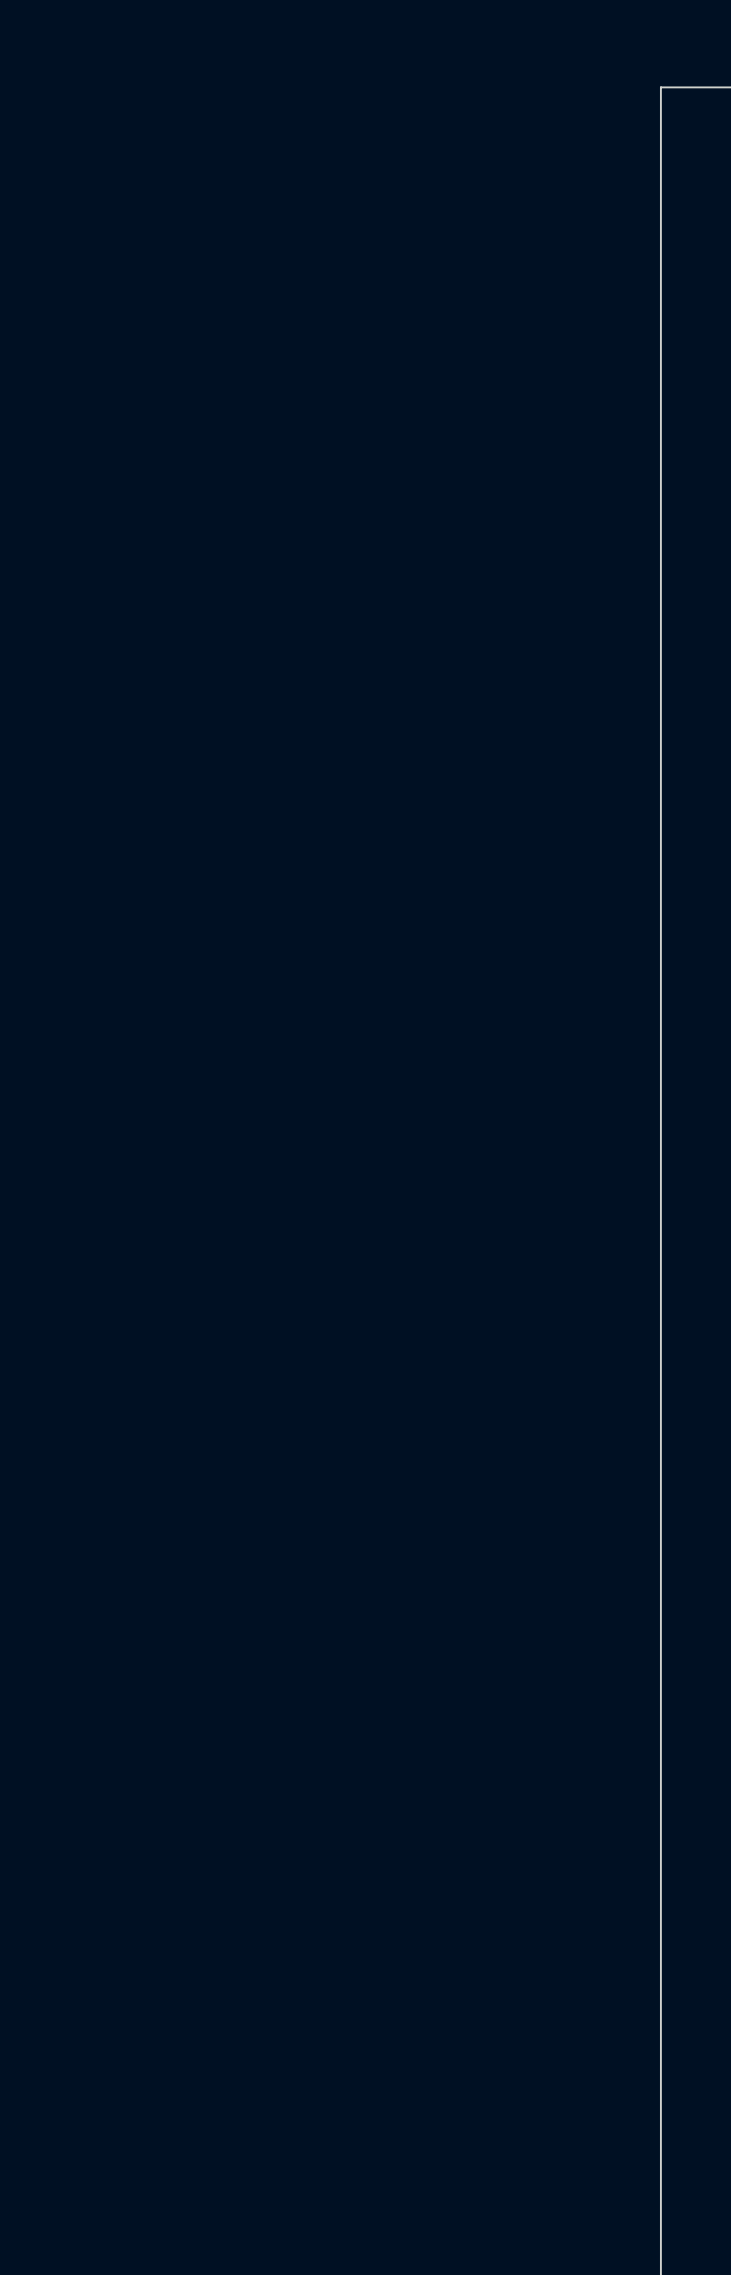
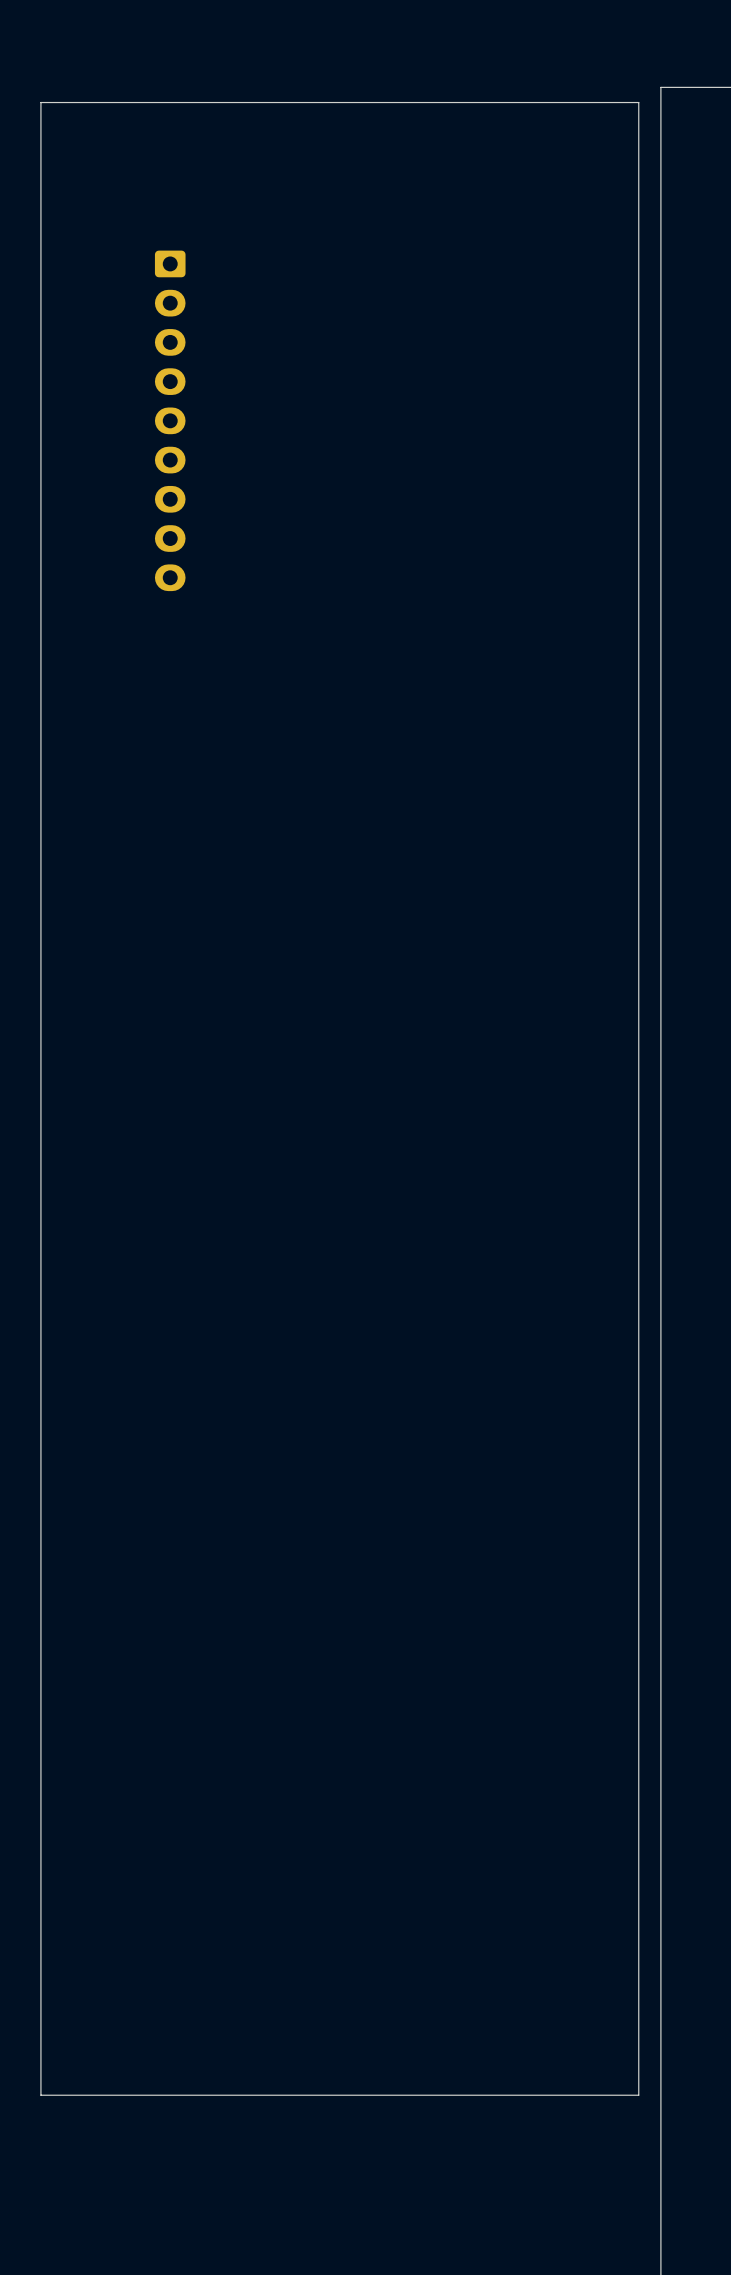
board edge: none -> (638, 102) (638, 2095) (40, 2095) (40, 102) (638, 102)
part: none -> (170, 420)

